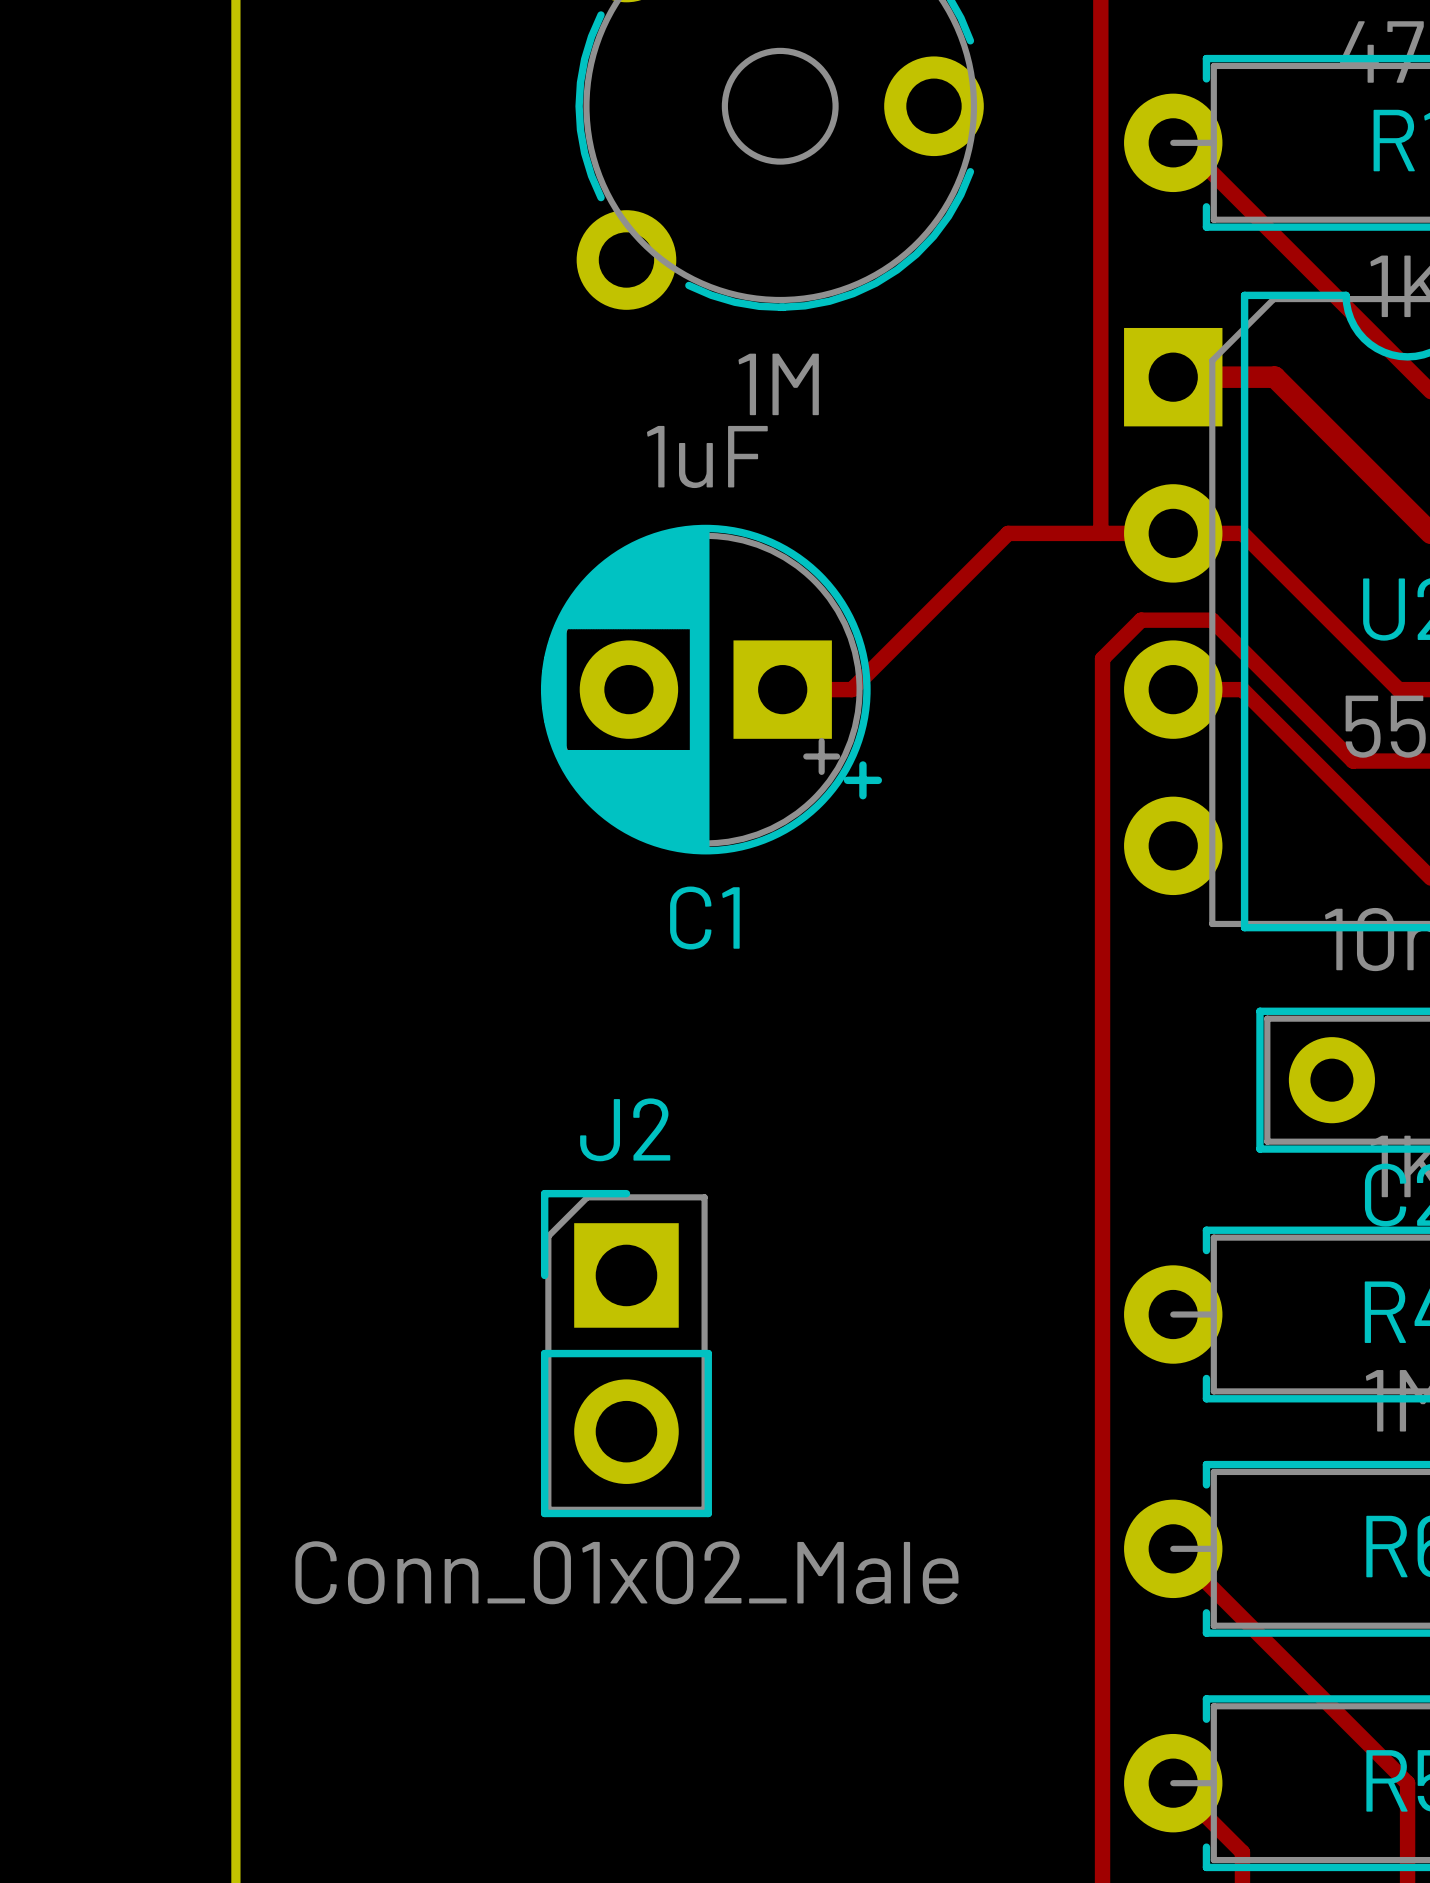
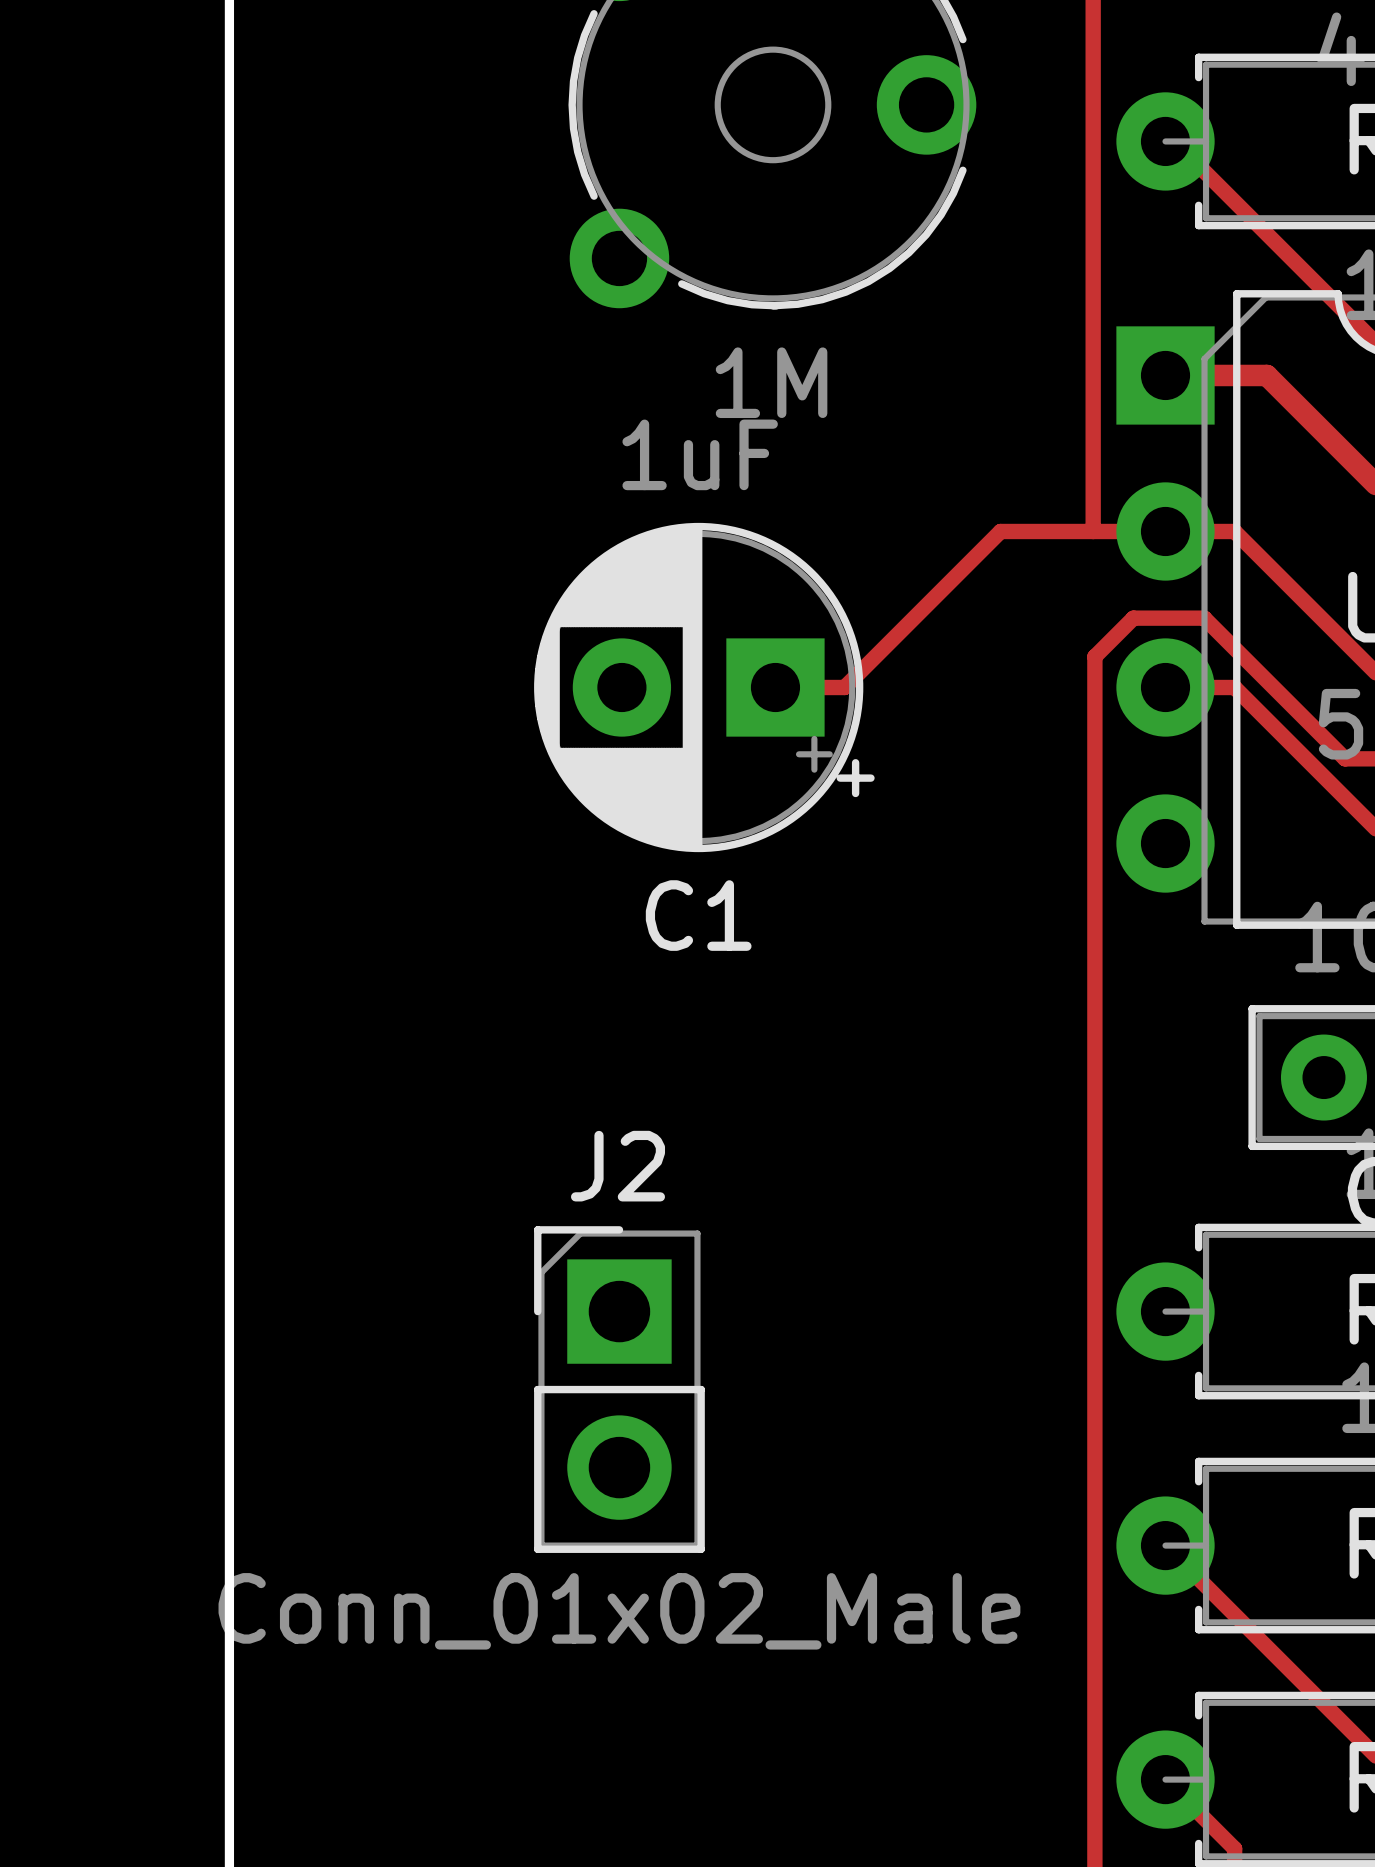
J2 position: (626, 1353) -> (619, 1389)

